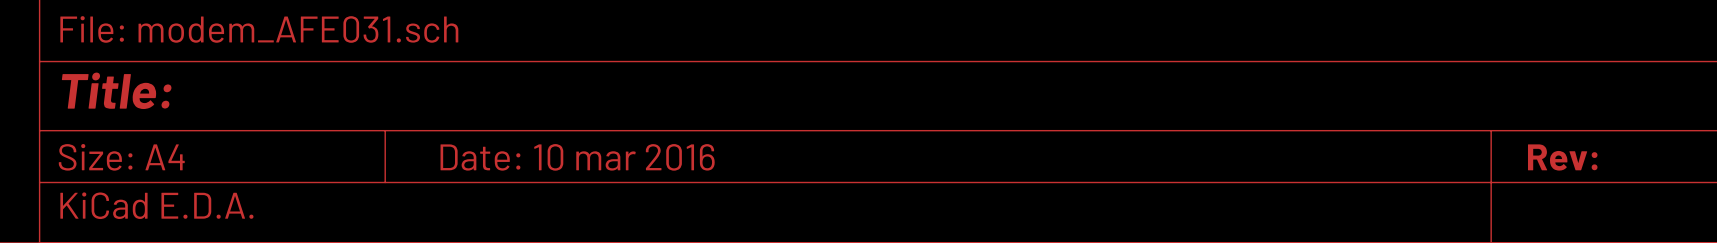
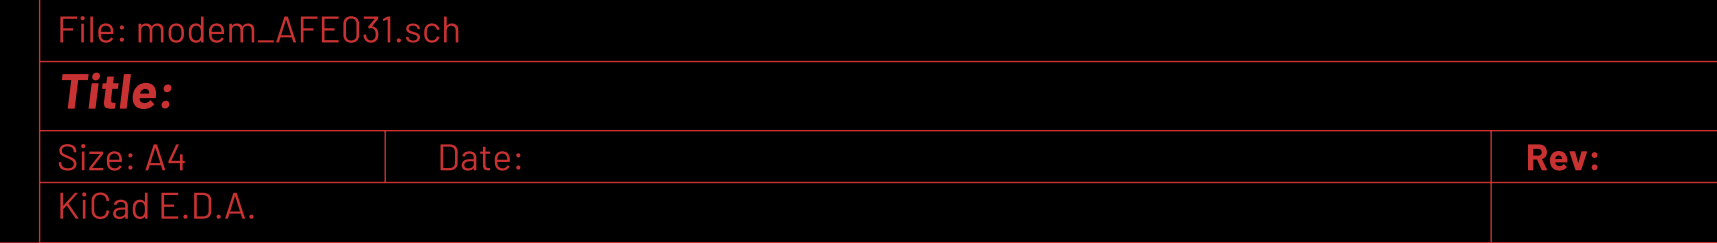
title block: Date: 10 mar 2016 (577, 157) -> Date: (480, 157)

